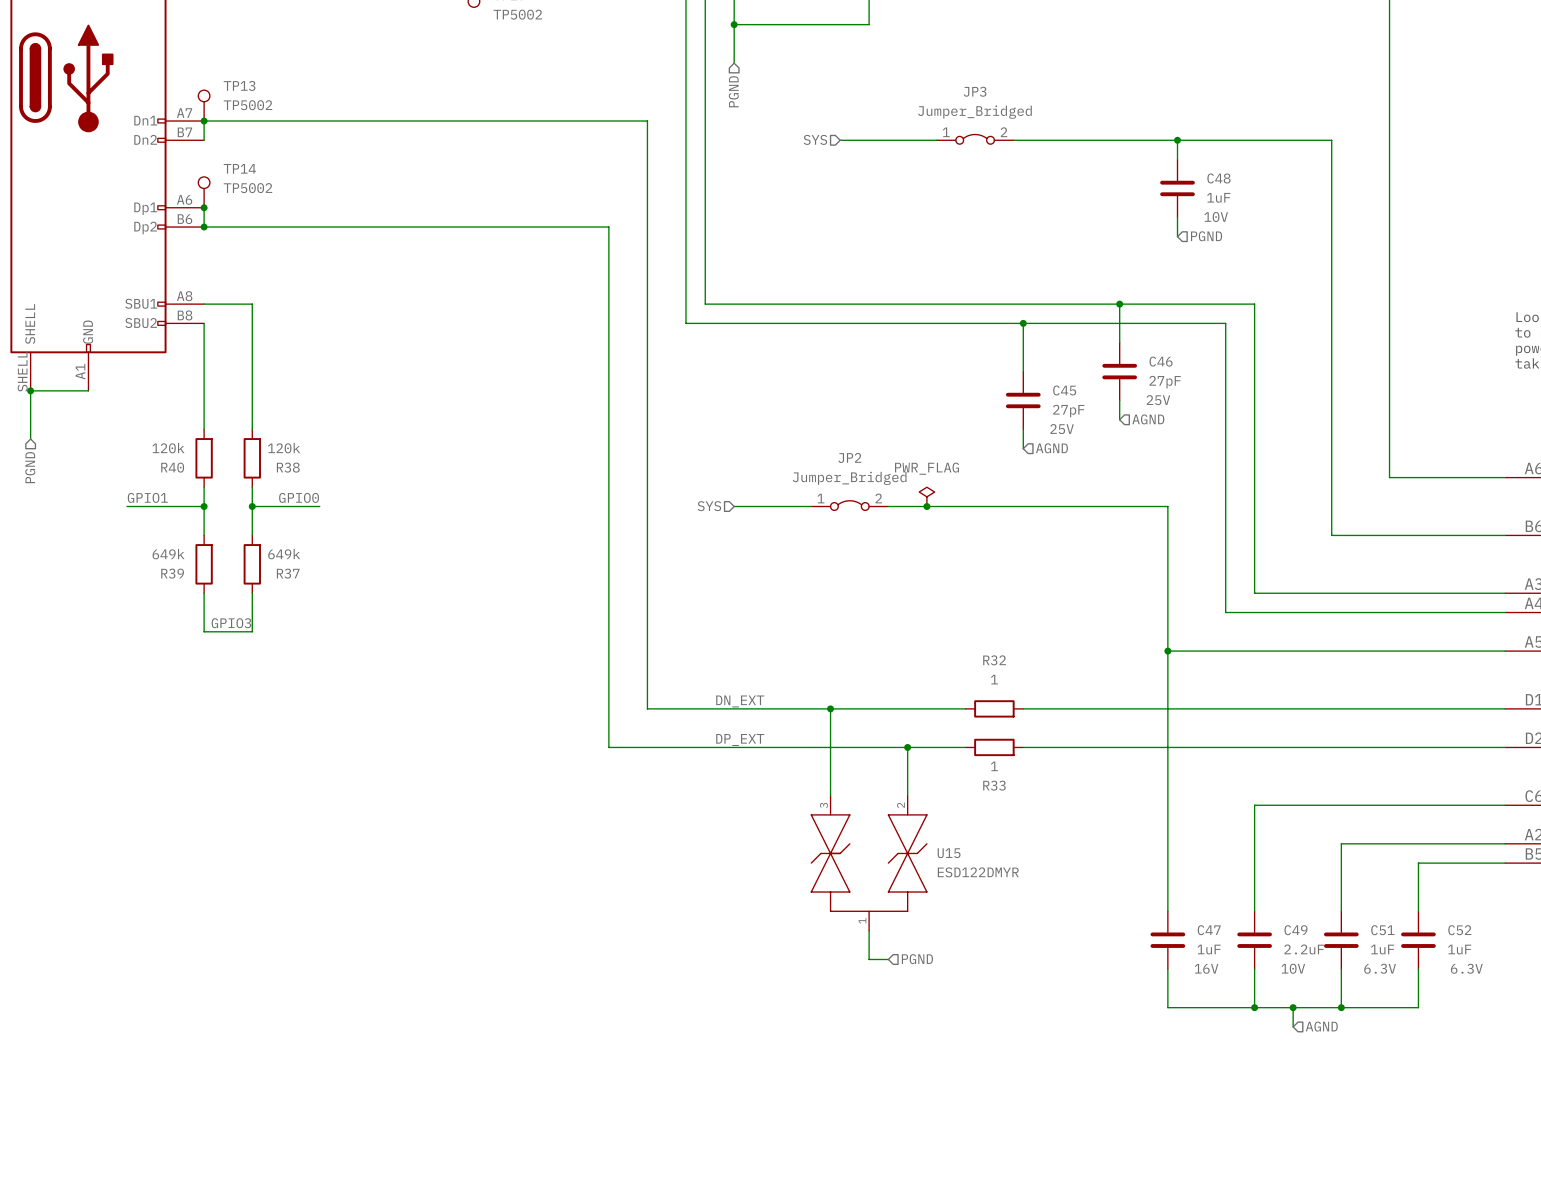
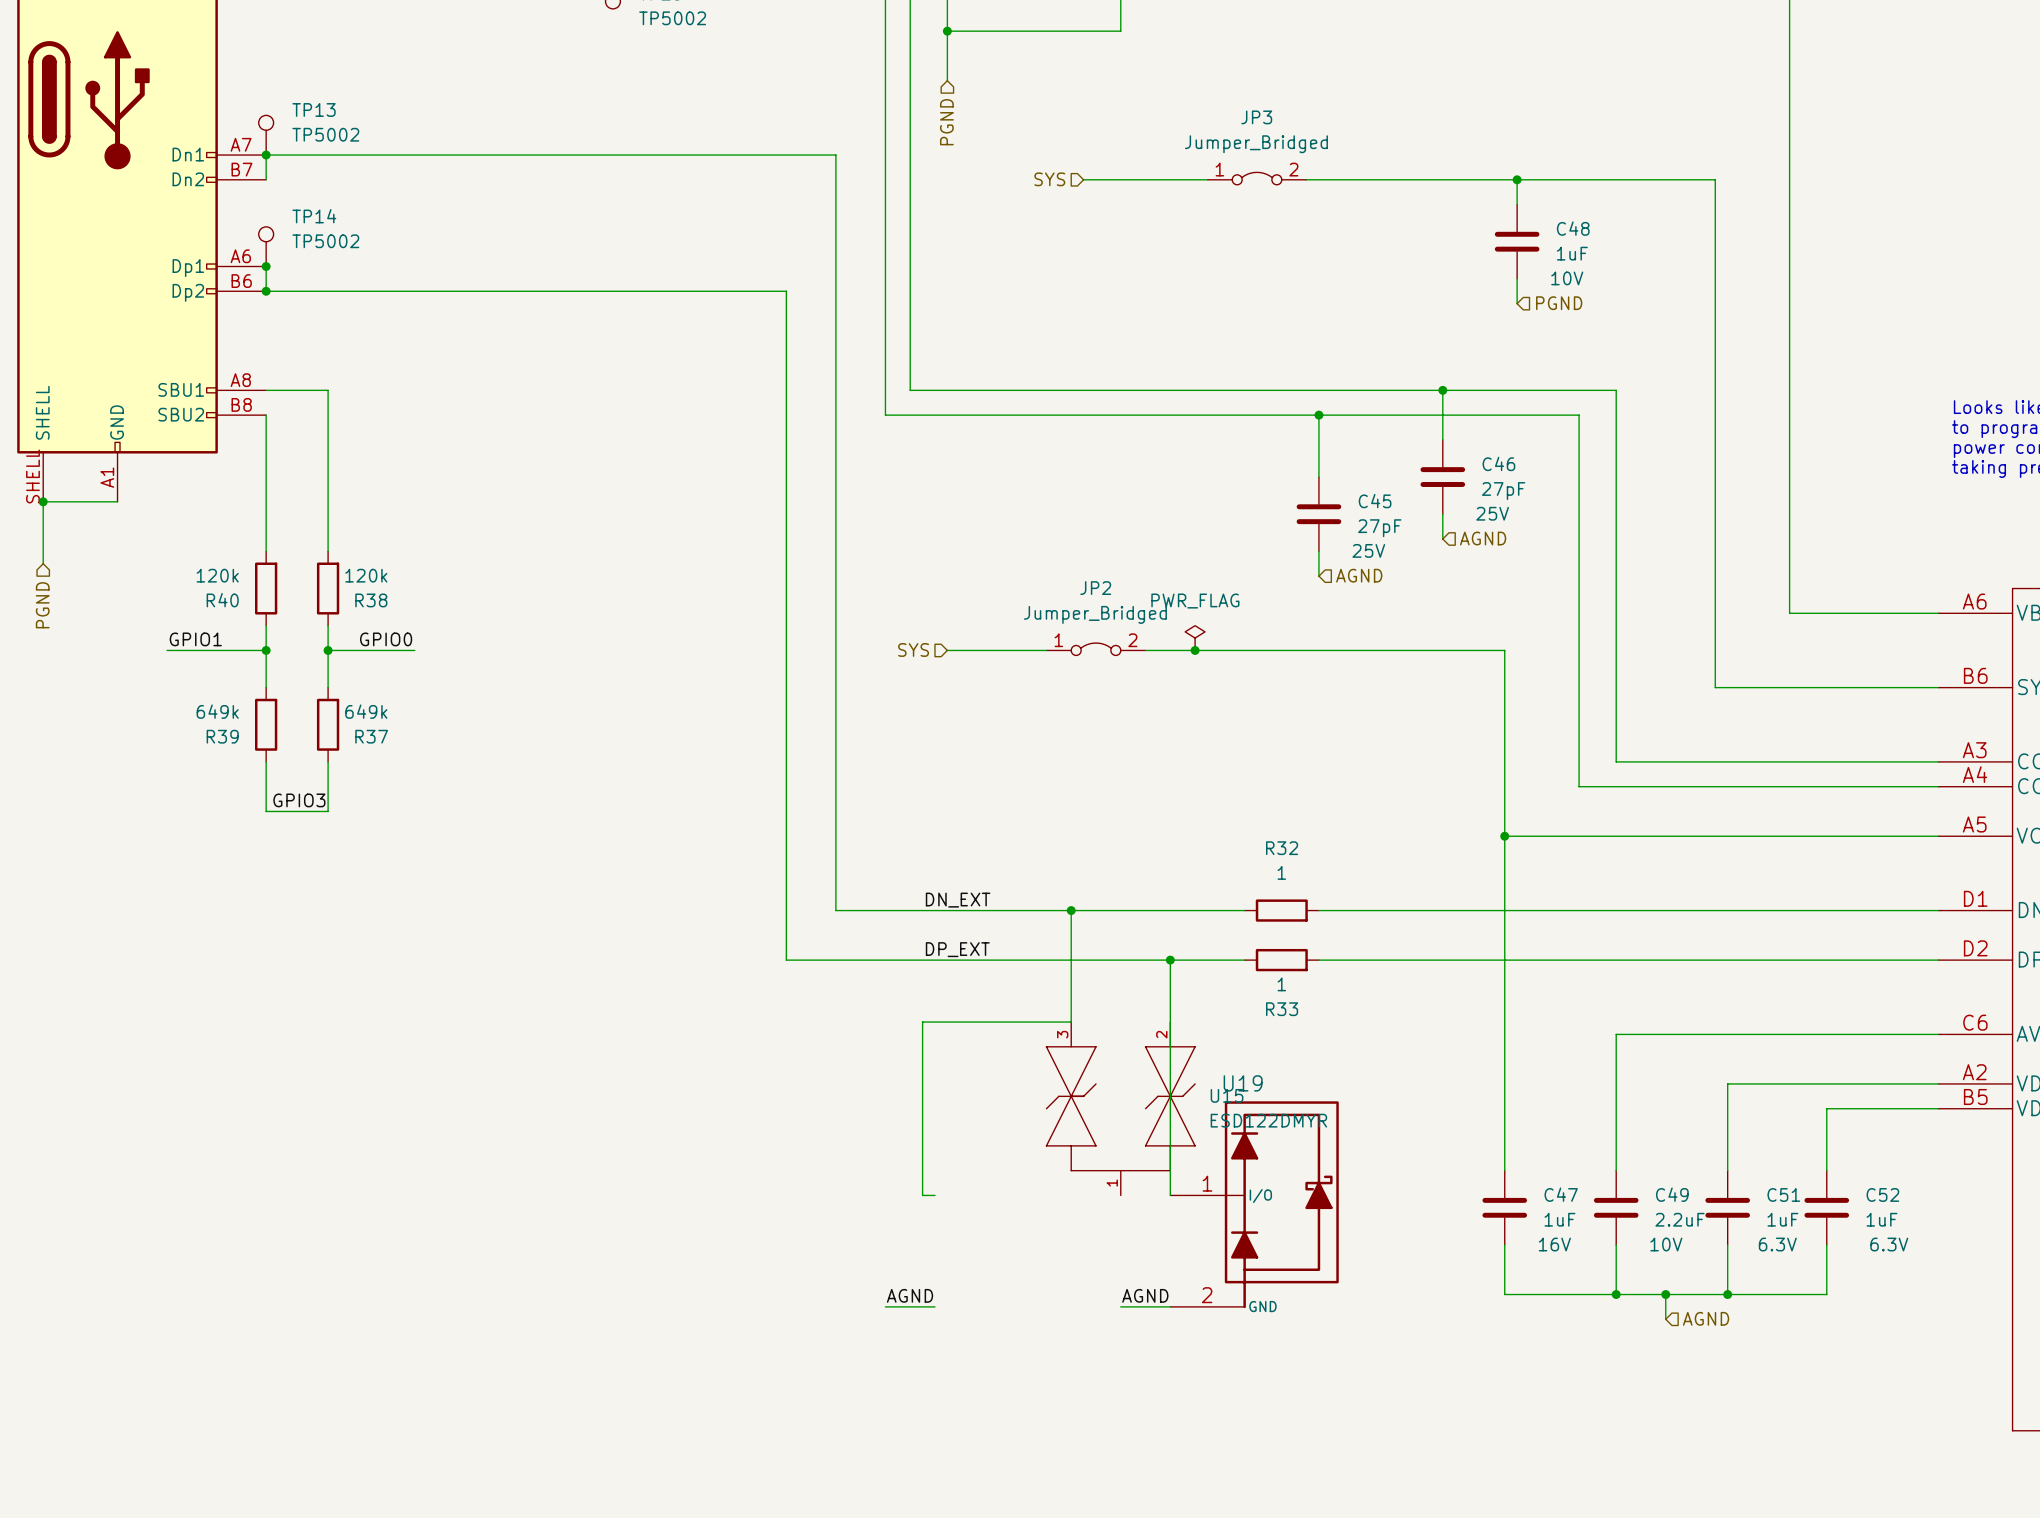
wire: none -> (1071, 1022) (922, 1022) (922, 1195) (934, 1195)
wire: none -> (1170, 1022) (1170, 1195)
wire: (869, 930) (869, 959) (888, 959) -> none
U19: none -> (1254, 1204)
hierarchical label: PGND (917, 959) -> none
label: none -> AGND (910, 1295)
label: none -> AGND (1145, 1295)
wire: none -> (885, 1306) (934, 1306)
wire: none -> (1120, 1306) (1170, 1306)

